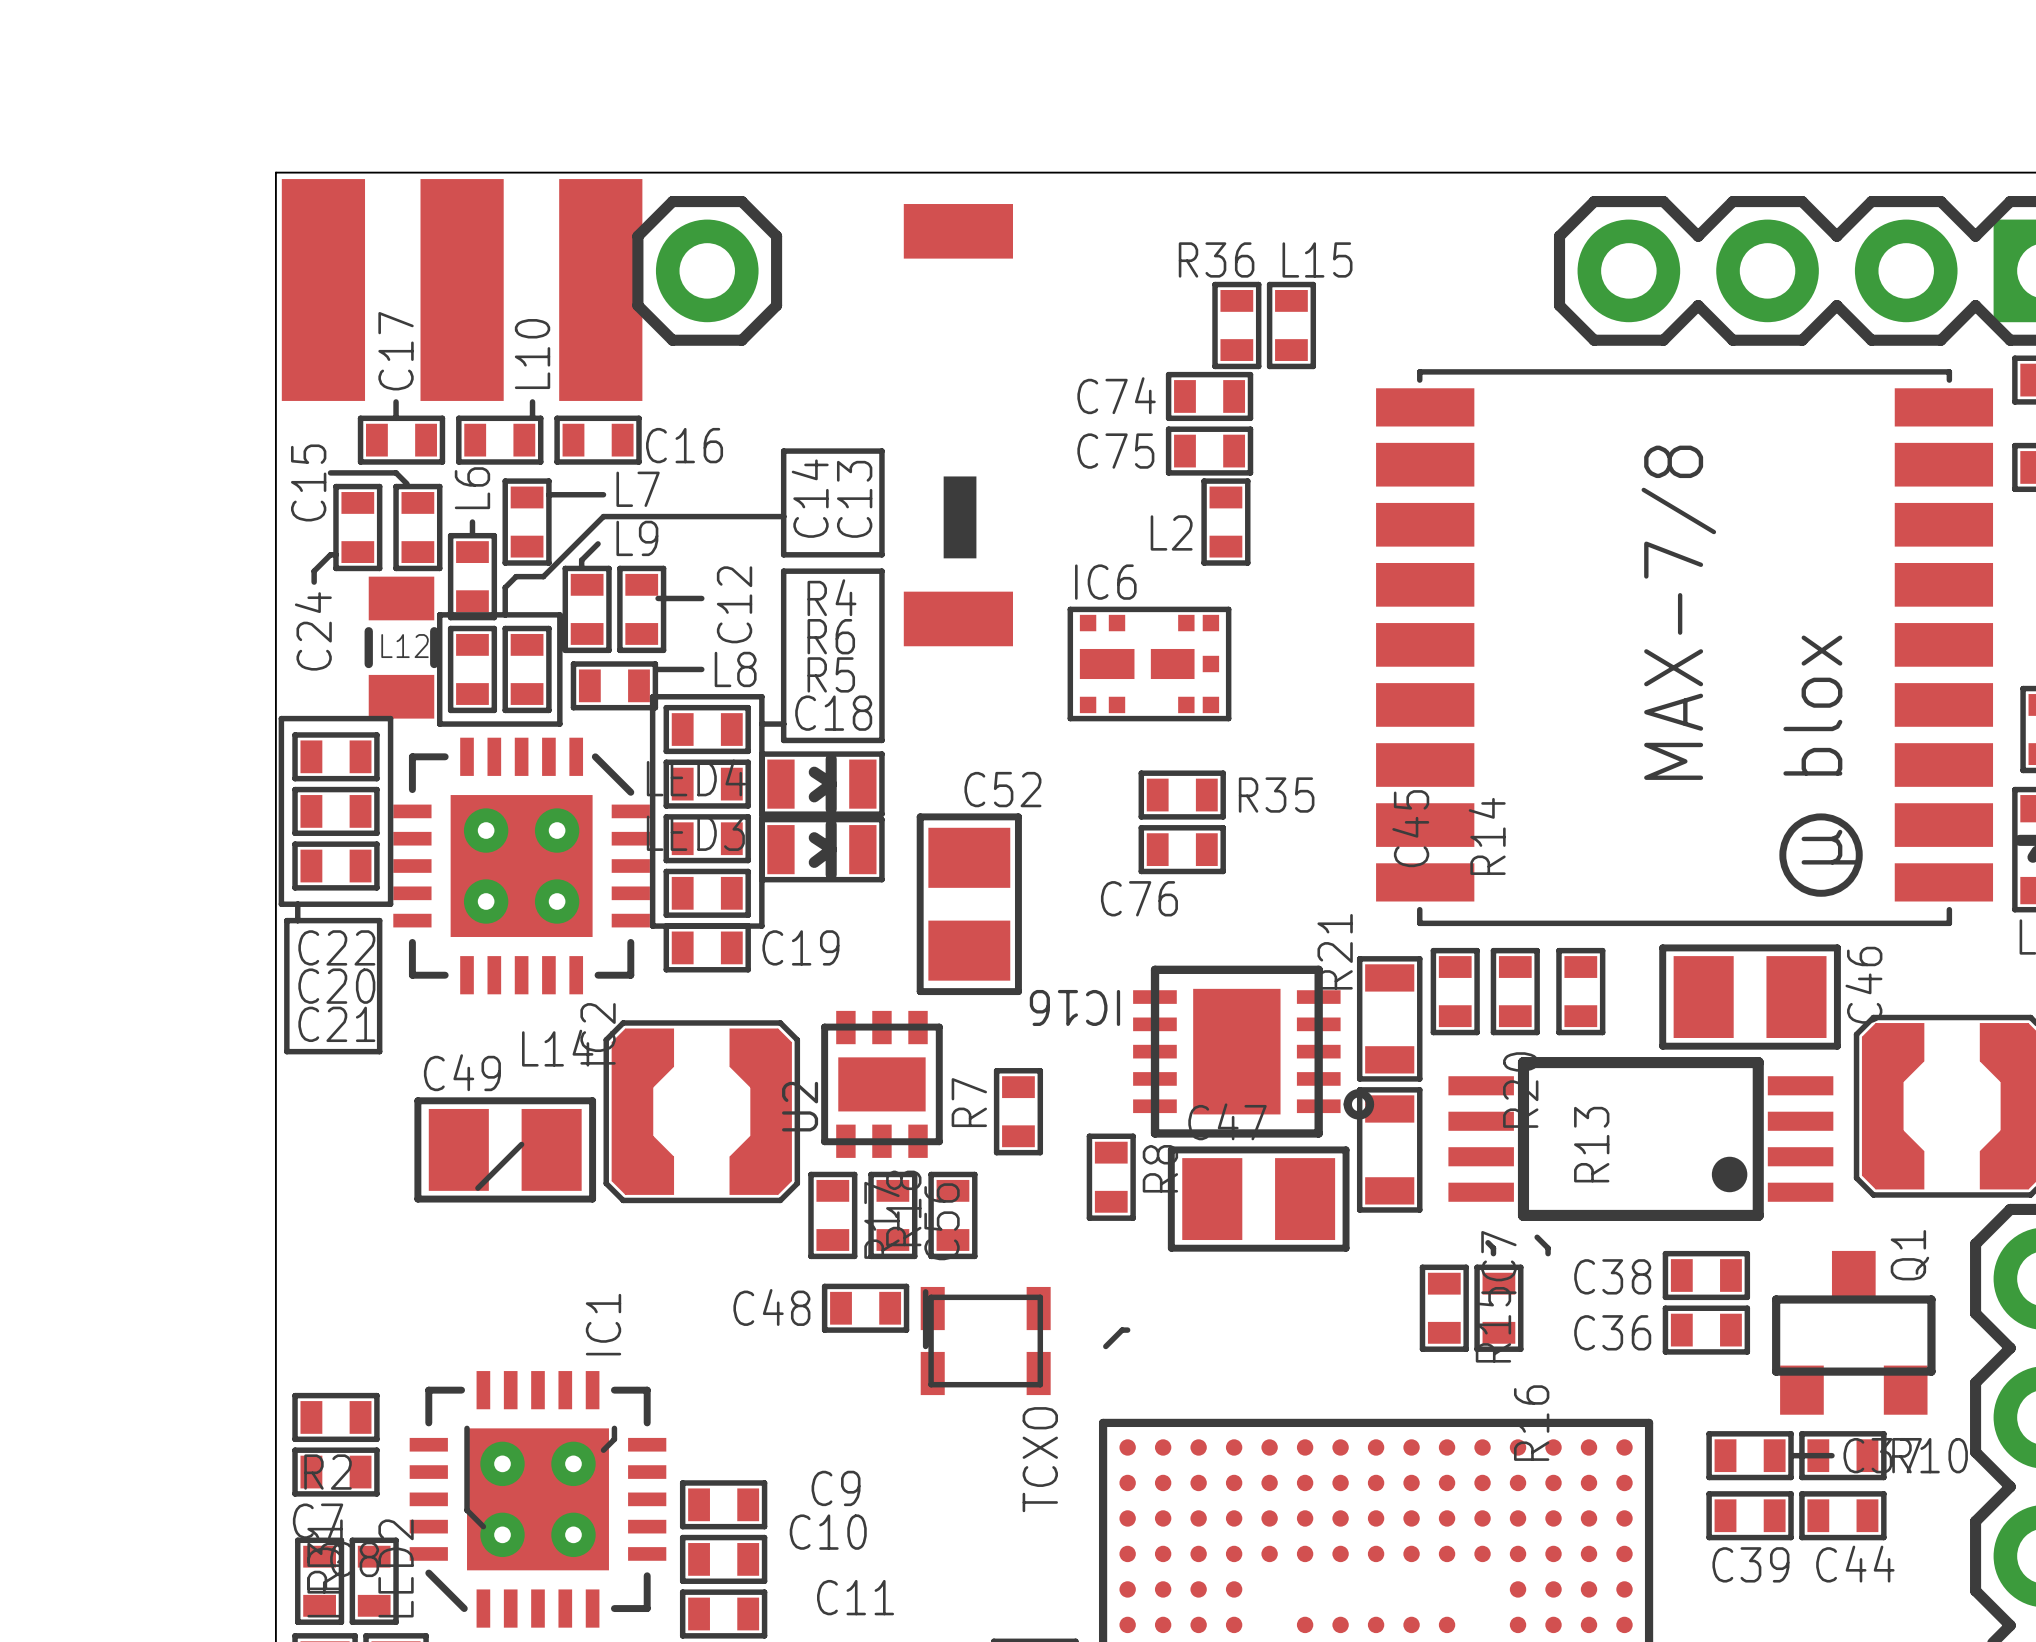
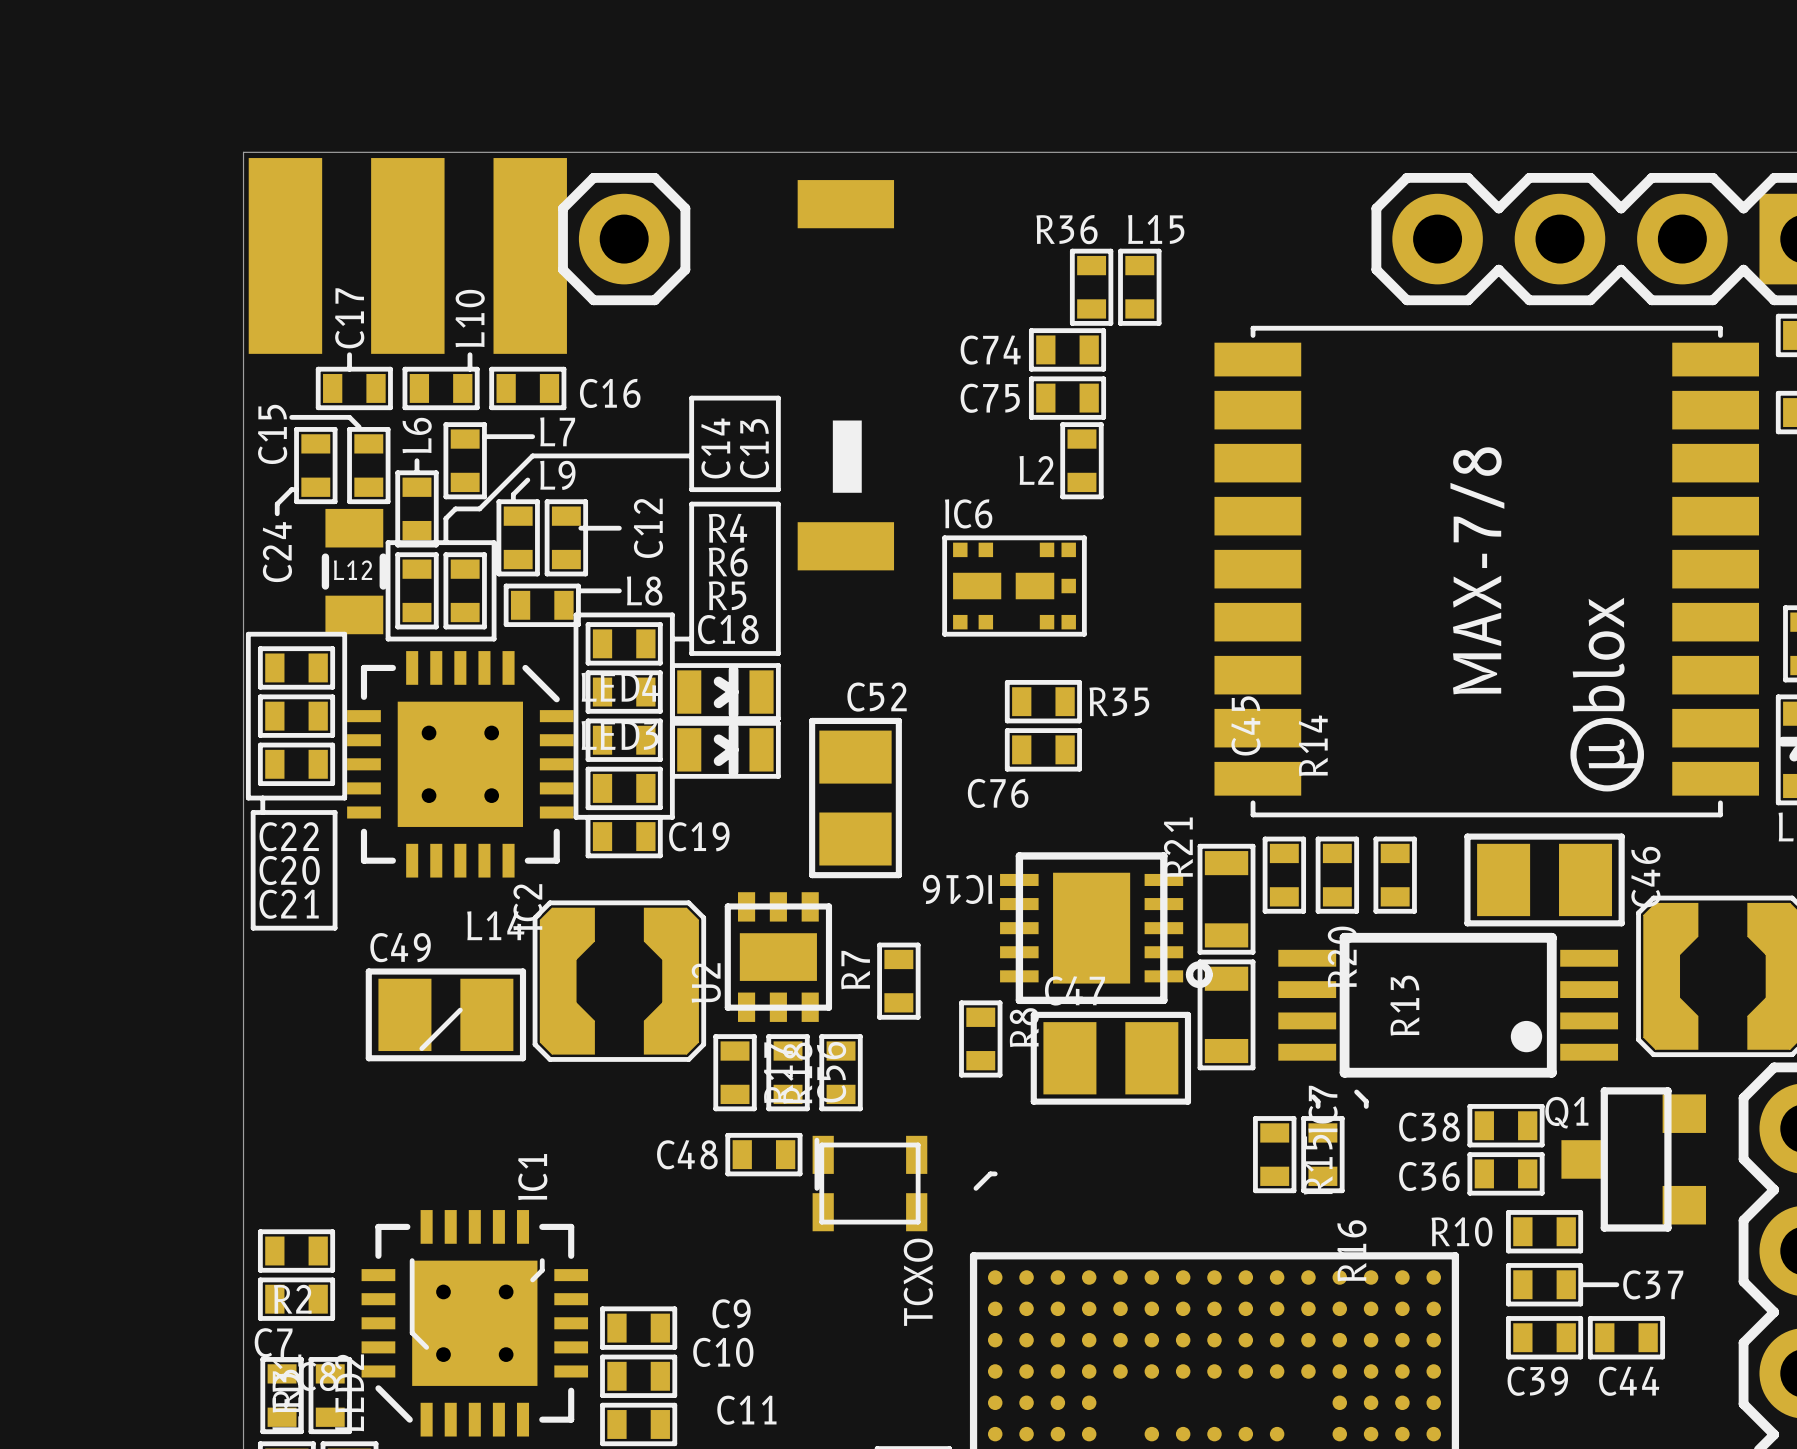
Q1 rotation: 0° (1853, 1332) -> 90° counterclockwise (1633, 1159)
R10 position: (1842, 1455) -> (1544, 1231)
R10 name position: R10 (1930, 1455) -> R10 (1461, 1231)

